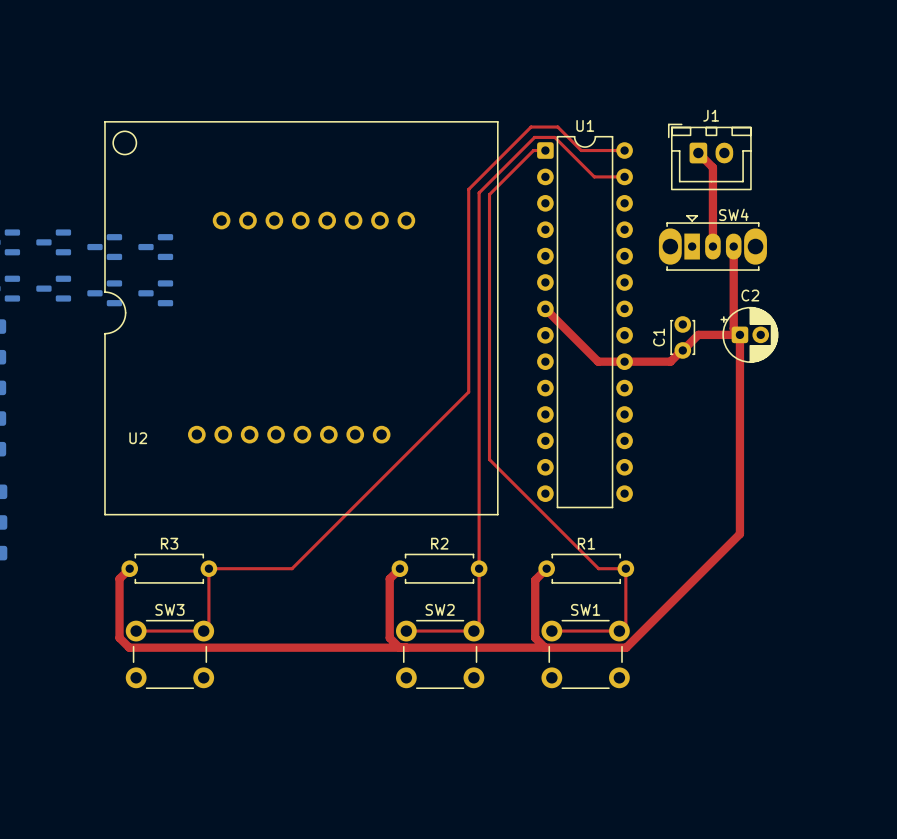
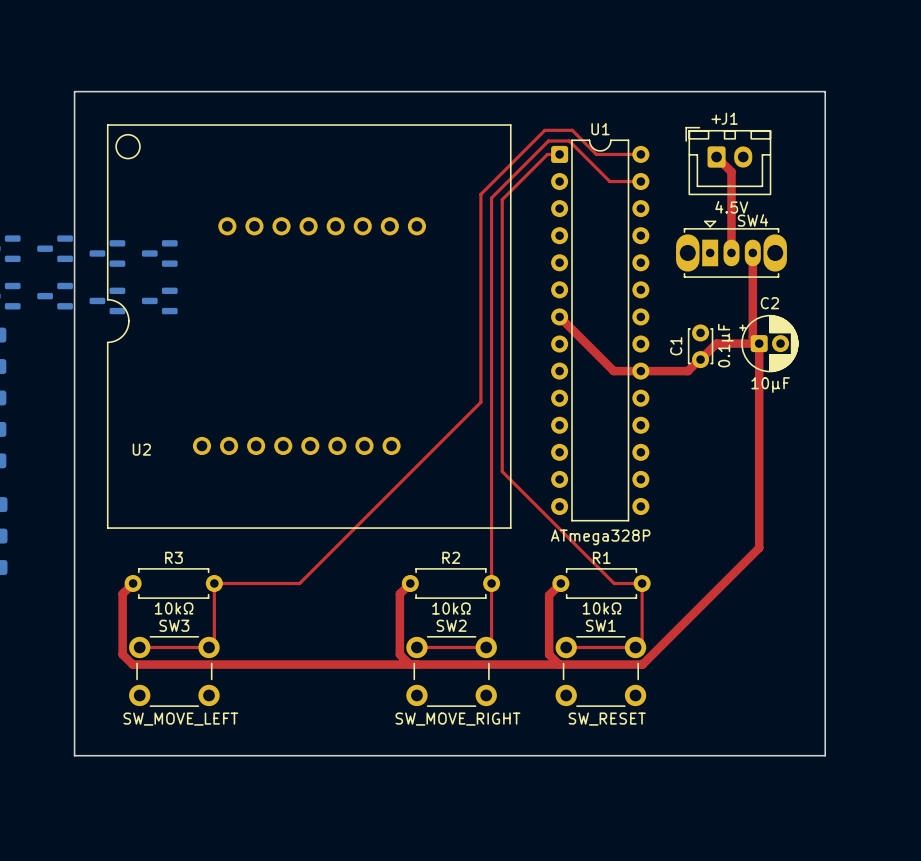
board edge: none -> (74, 91) (825, 91) (825, 755) (74, 755) (74, 91)
text: none -> + (716, 119)
text: none -> 4.5V (731, 207)
text: none -> 0.1μF (725, 345)
text: none -> 10μF (770, 385)
text: none -> ATmega328P (600, 537)
text: none -> 10kΩ (174, 608)
text: none -> 10kΩ (602, 608)
text: none -> 10kΩ (451, 608)
text: none -> SW_MOVE_LEFT (180, 719)
text: none -> SW_MOVE_RIGHT (457, 719)
text: none -> SW_RESET (607, 719)

